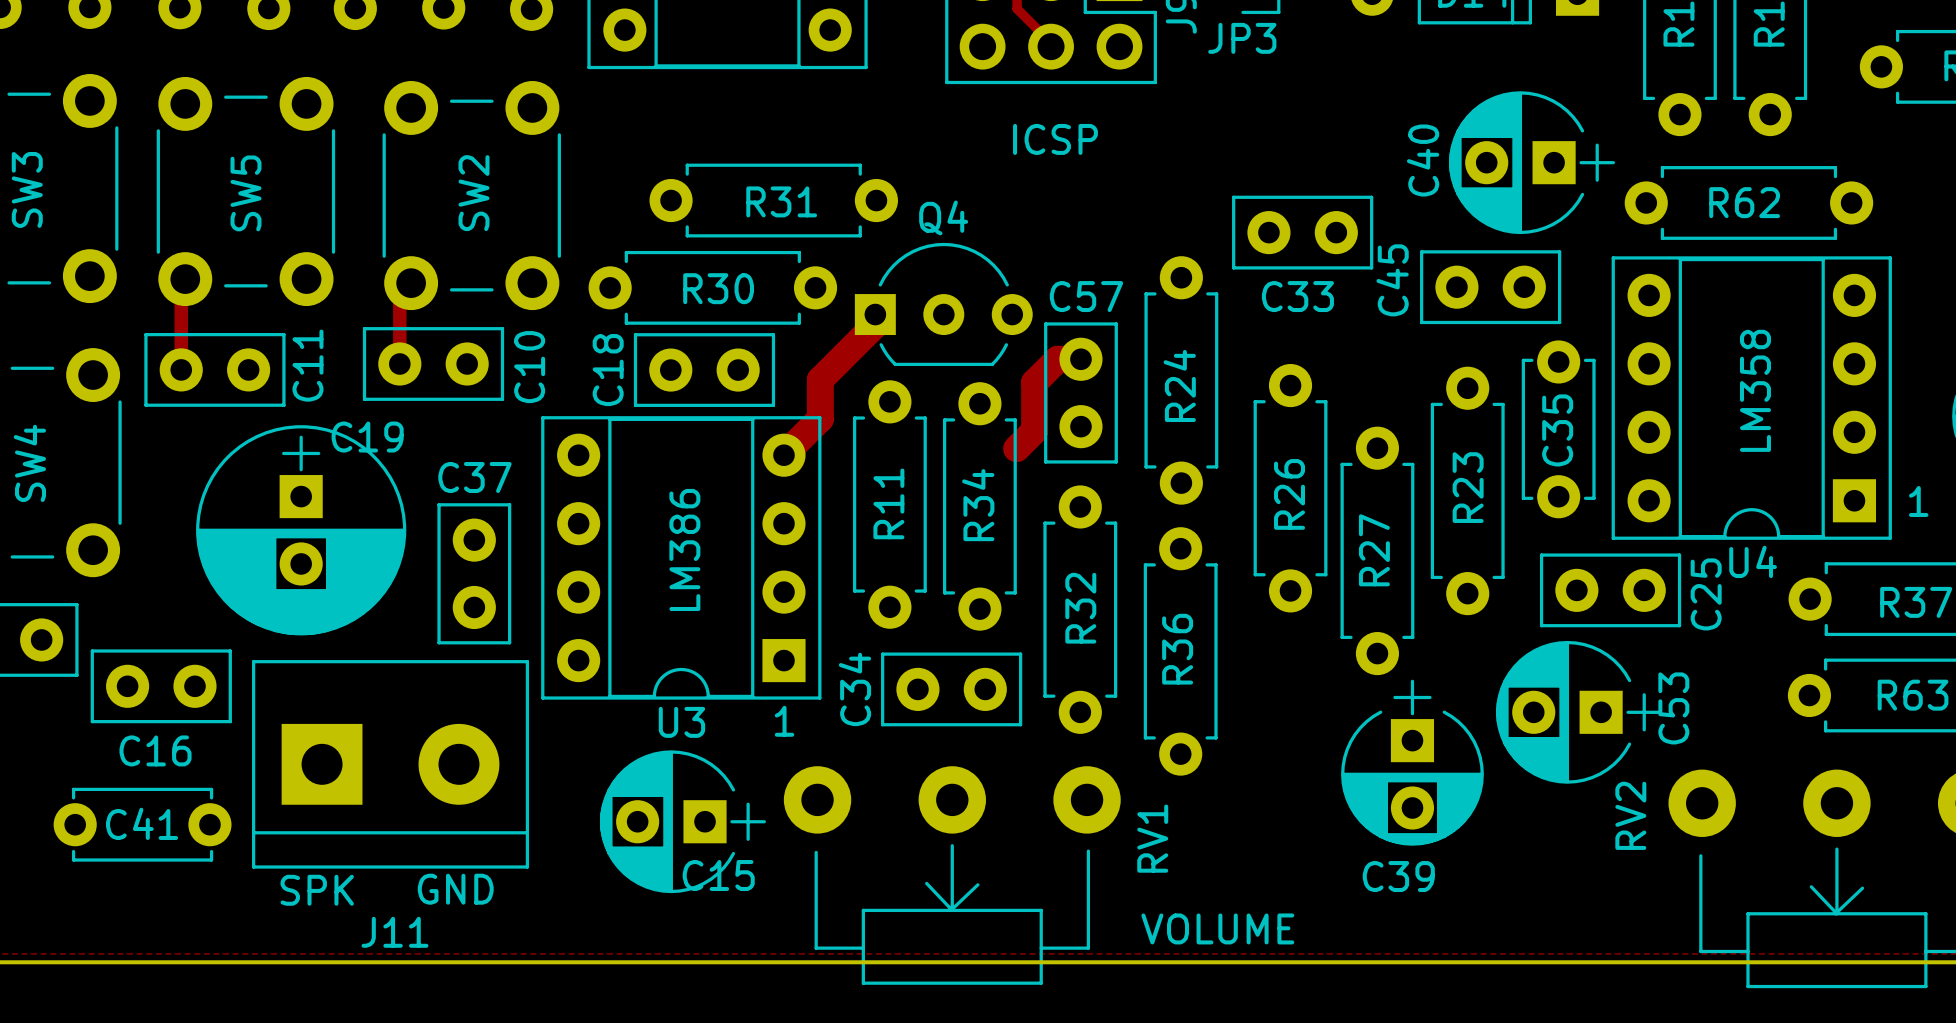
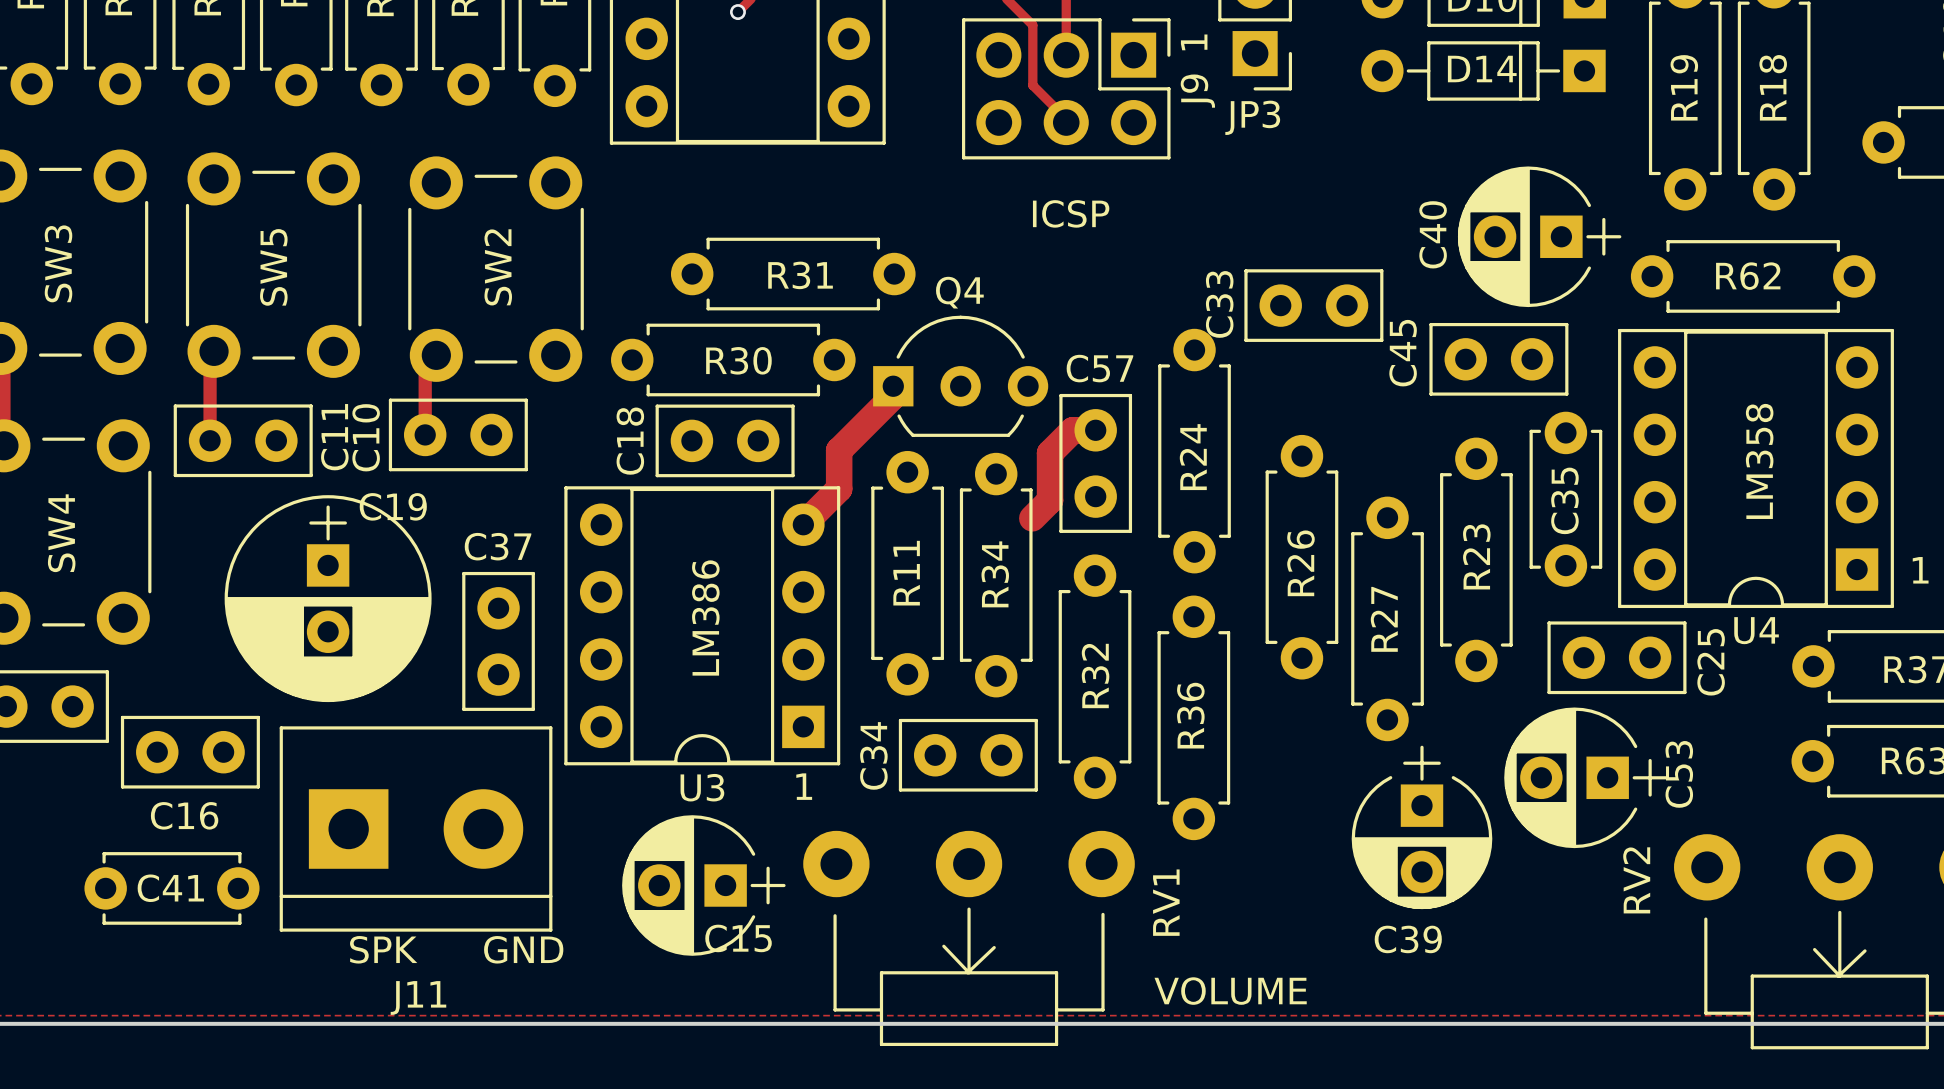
C33 name rotation: 0° (1297, 296) -> 90° counterclockwise (1219, 304)
C33 name position: C33 (1297, 296) -> C33 (1219, 304)
C10 name position: C10 (529, 367) -> C10 (366, 437)
text position: GND (455, 889) -> GND (523, 949)
text position: SPK (317, 890) -> SPK (383, 949)

